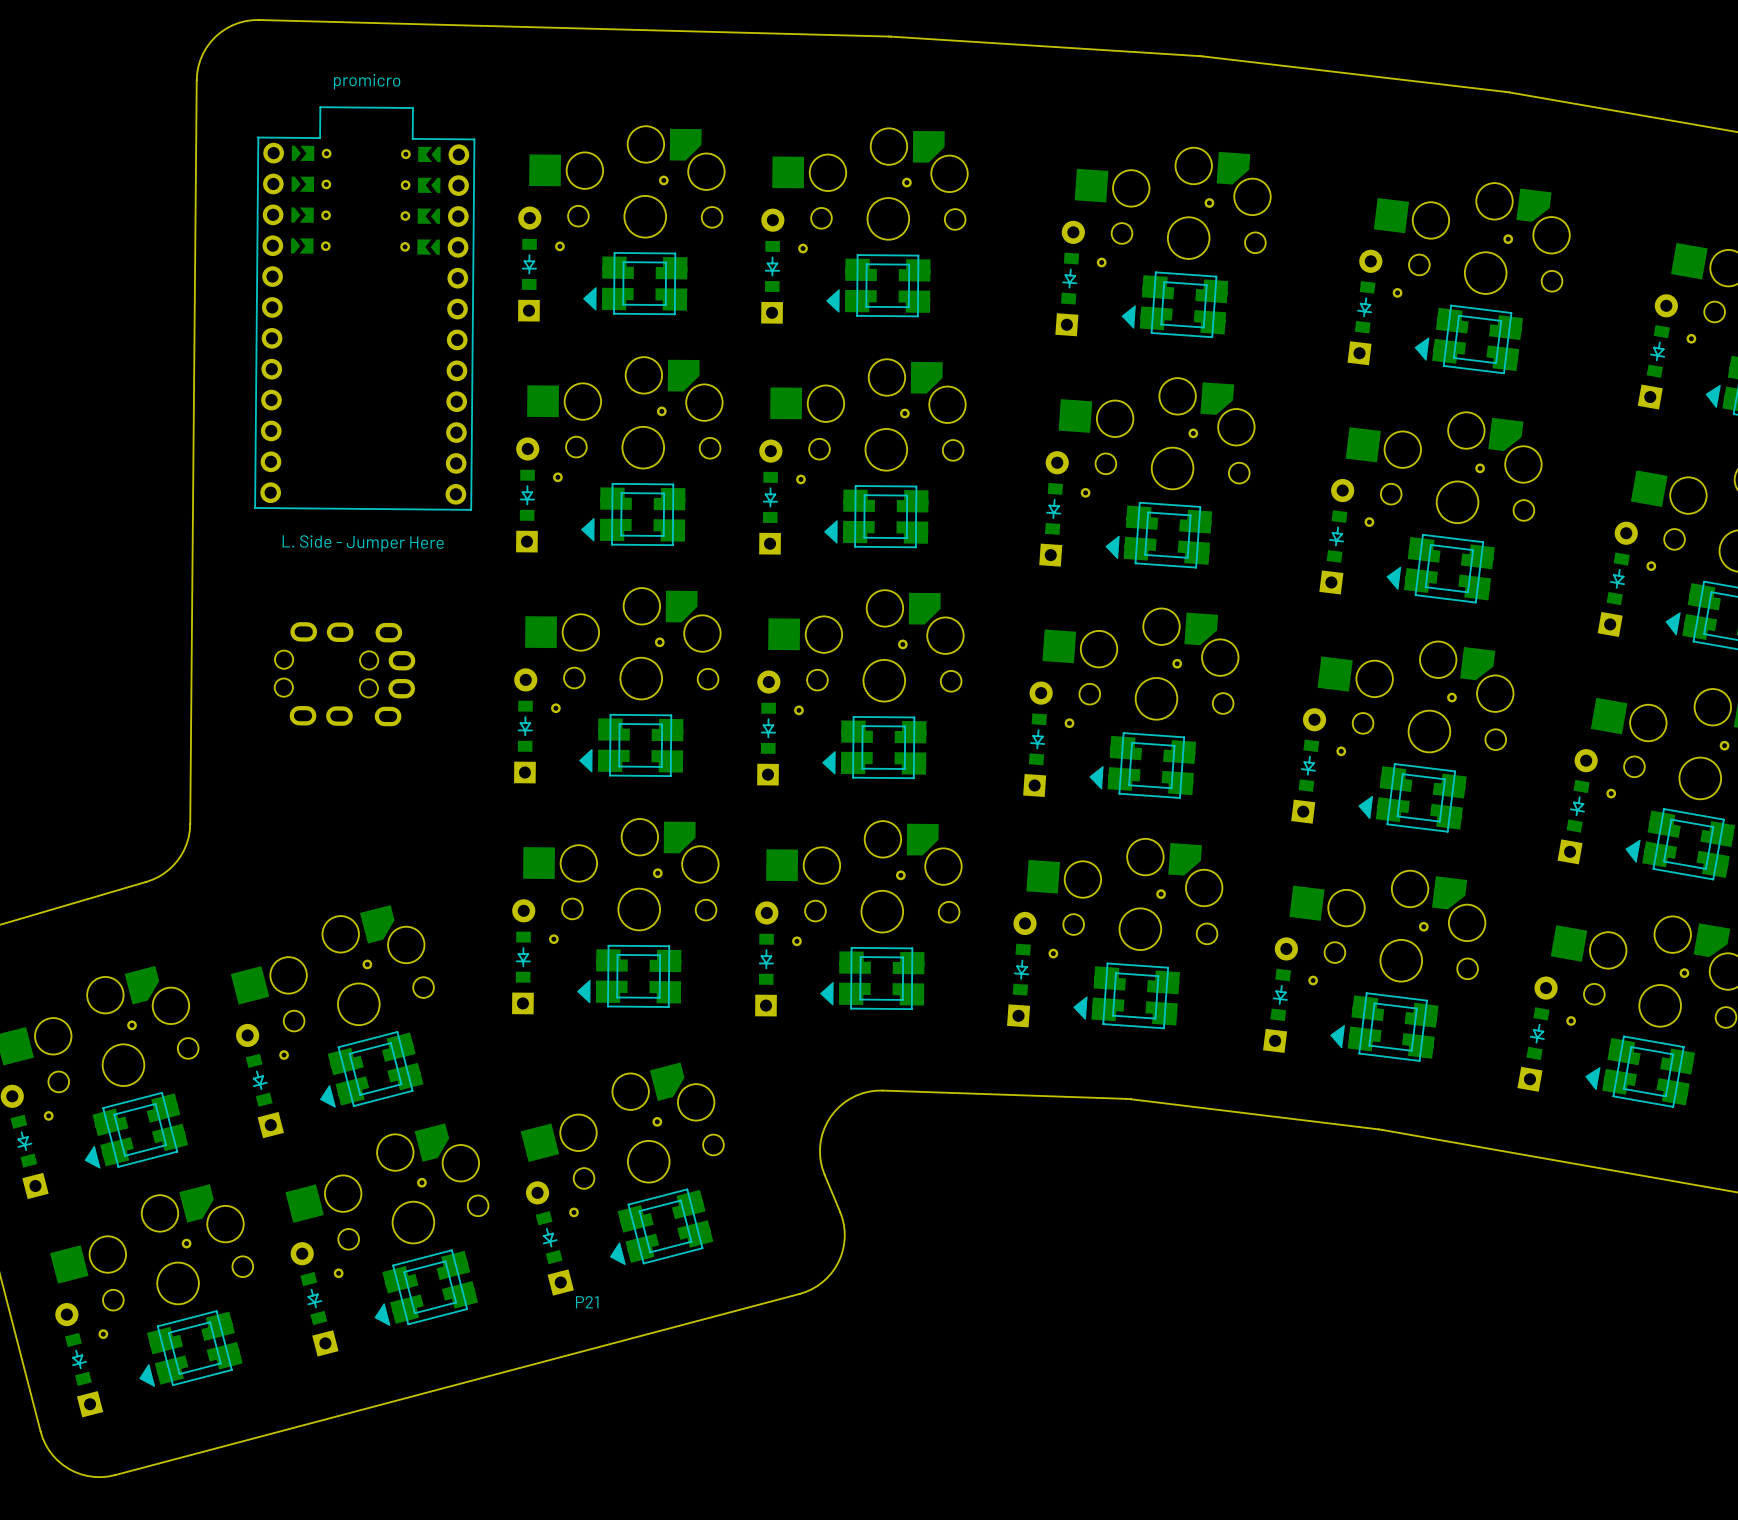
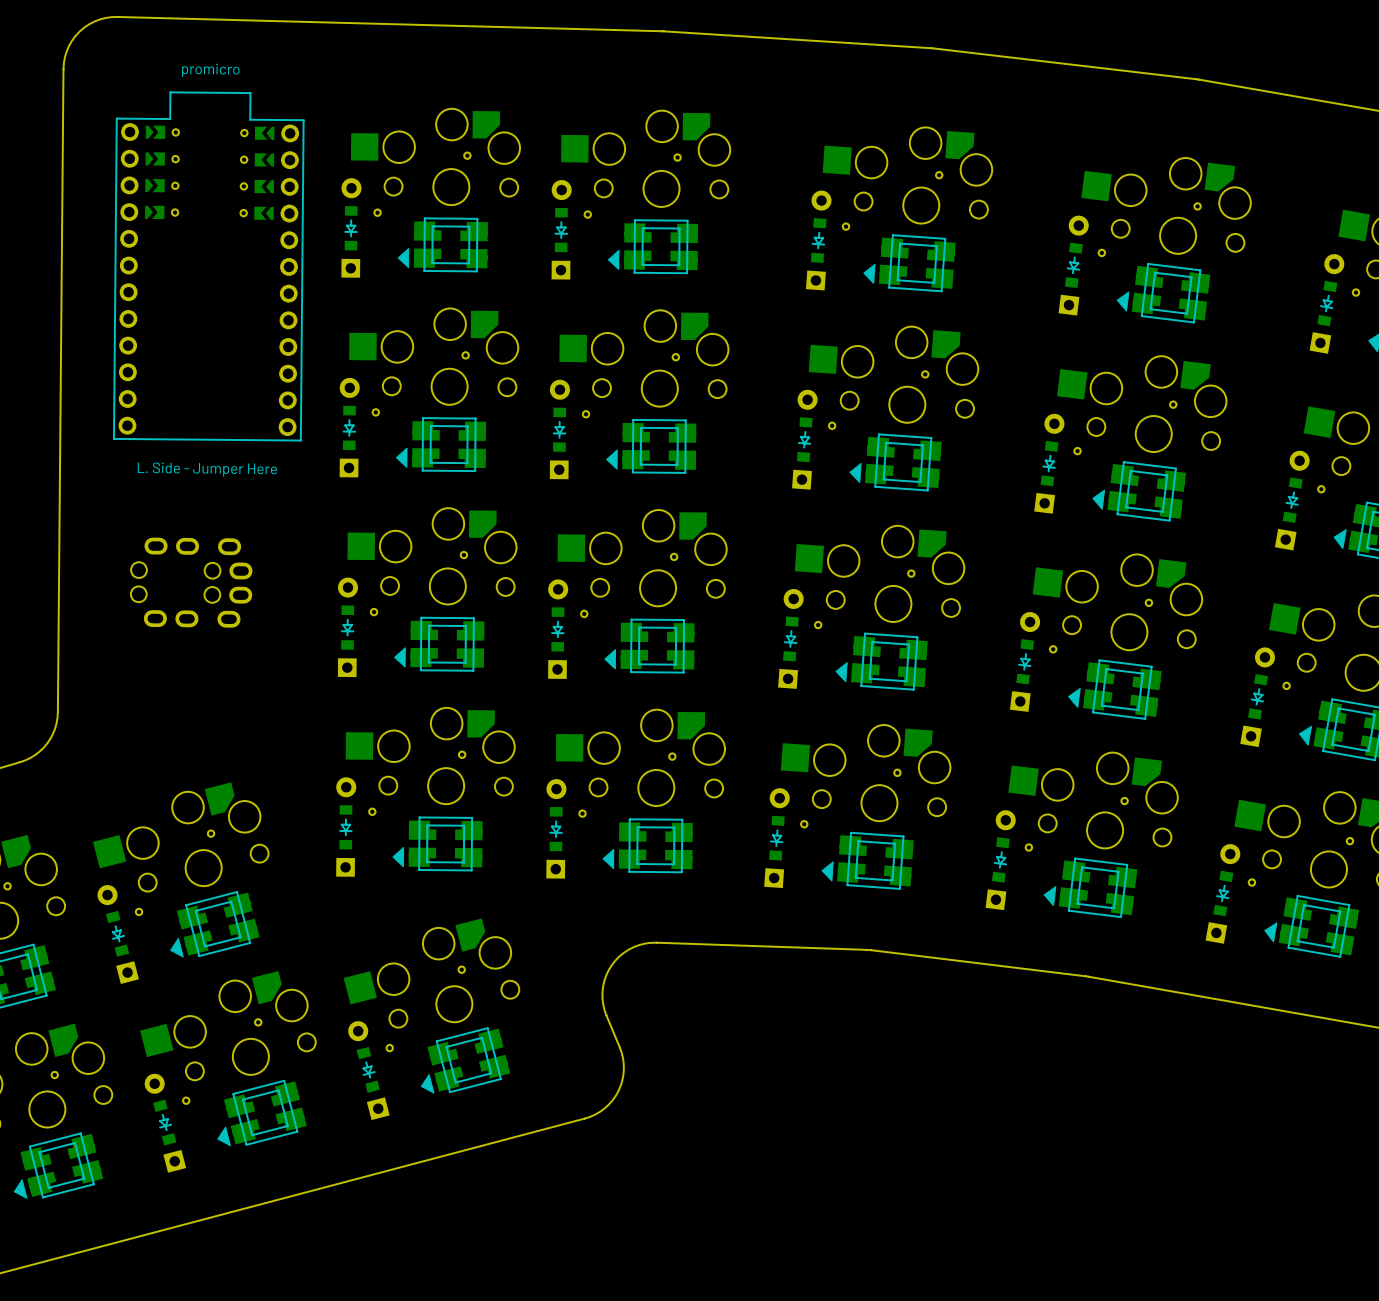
text: P21 (587, 1302) -> none

